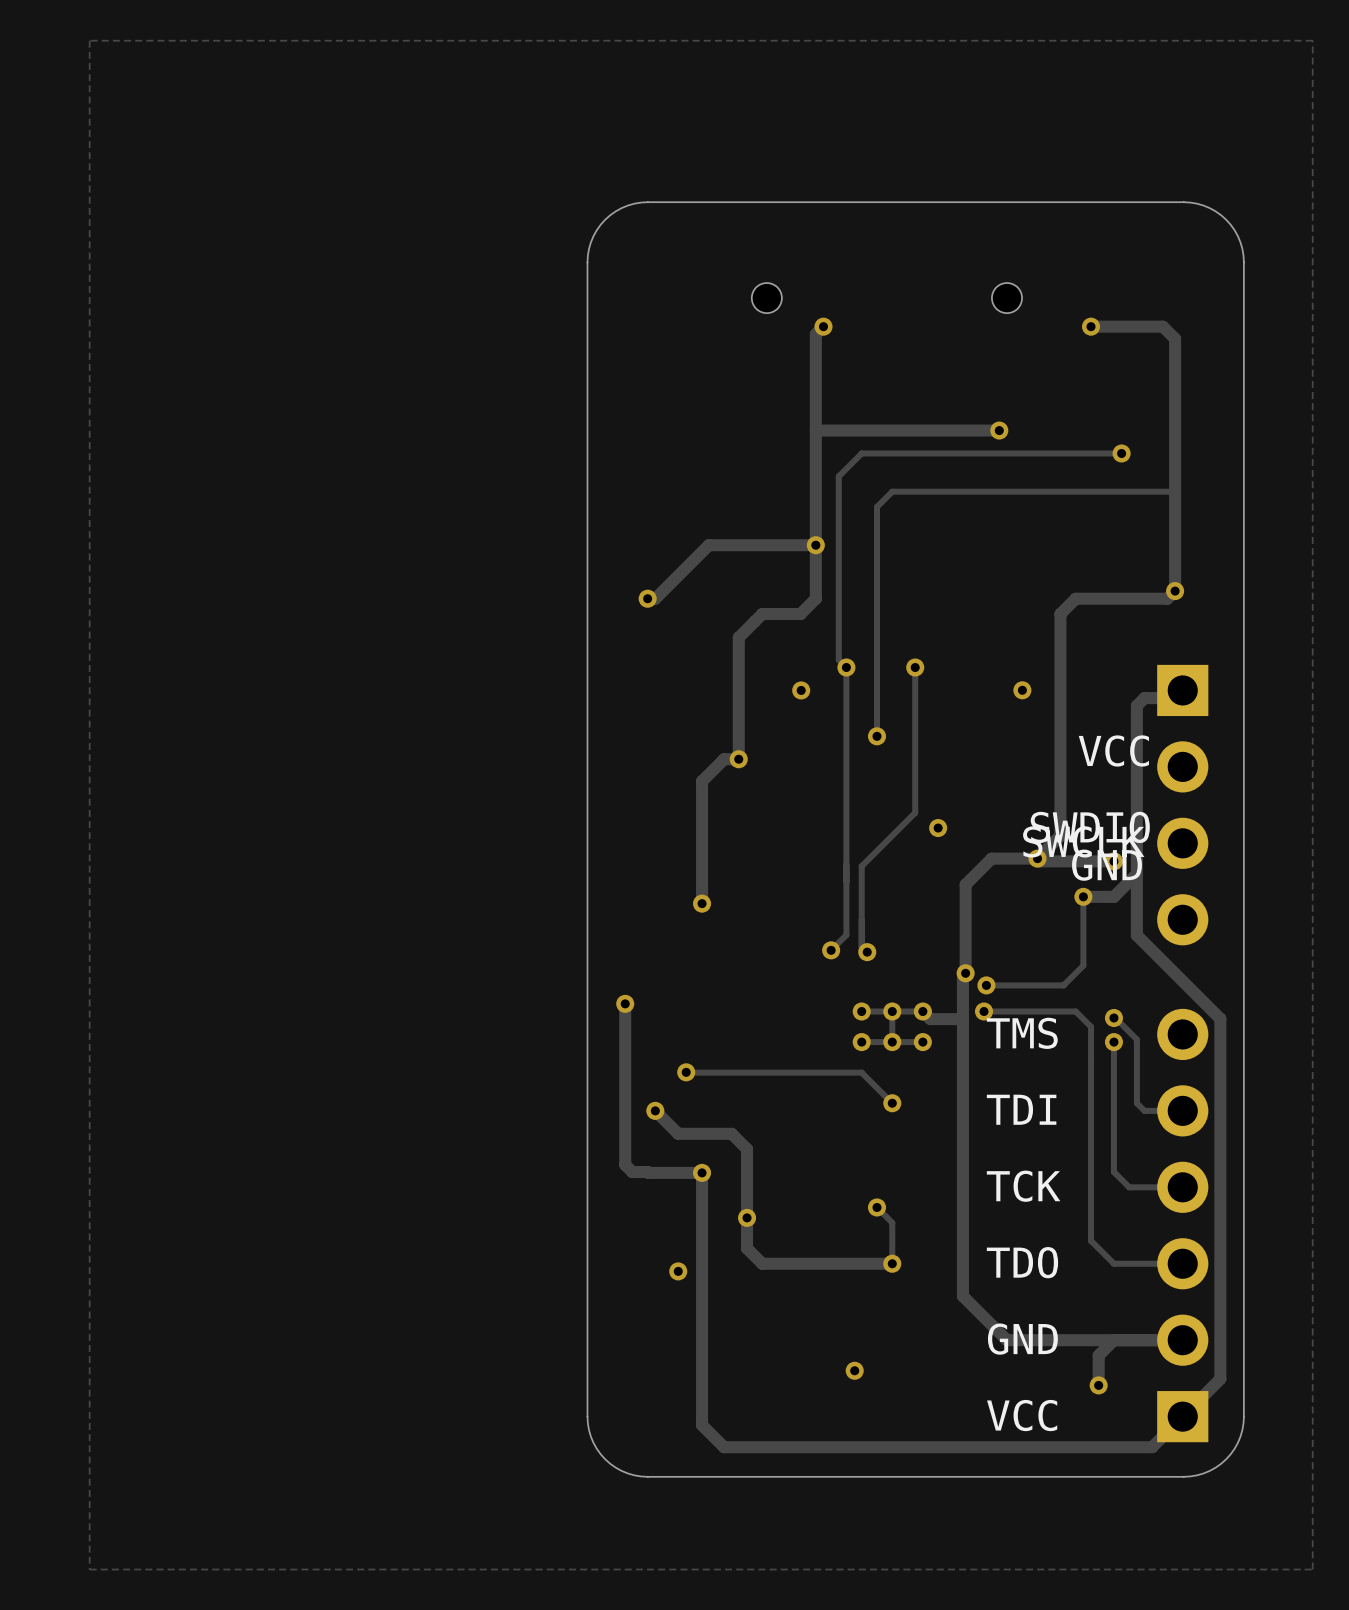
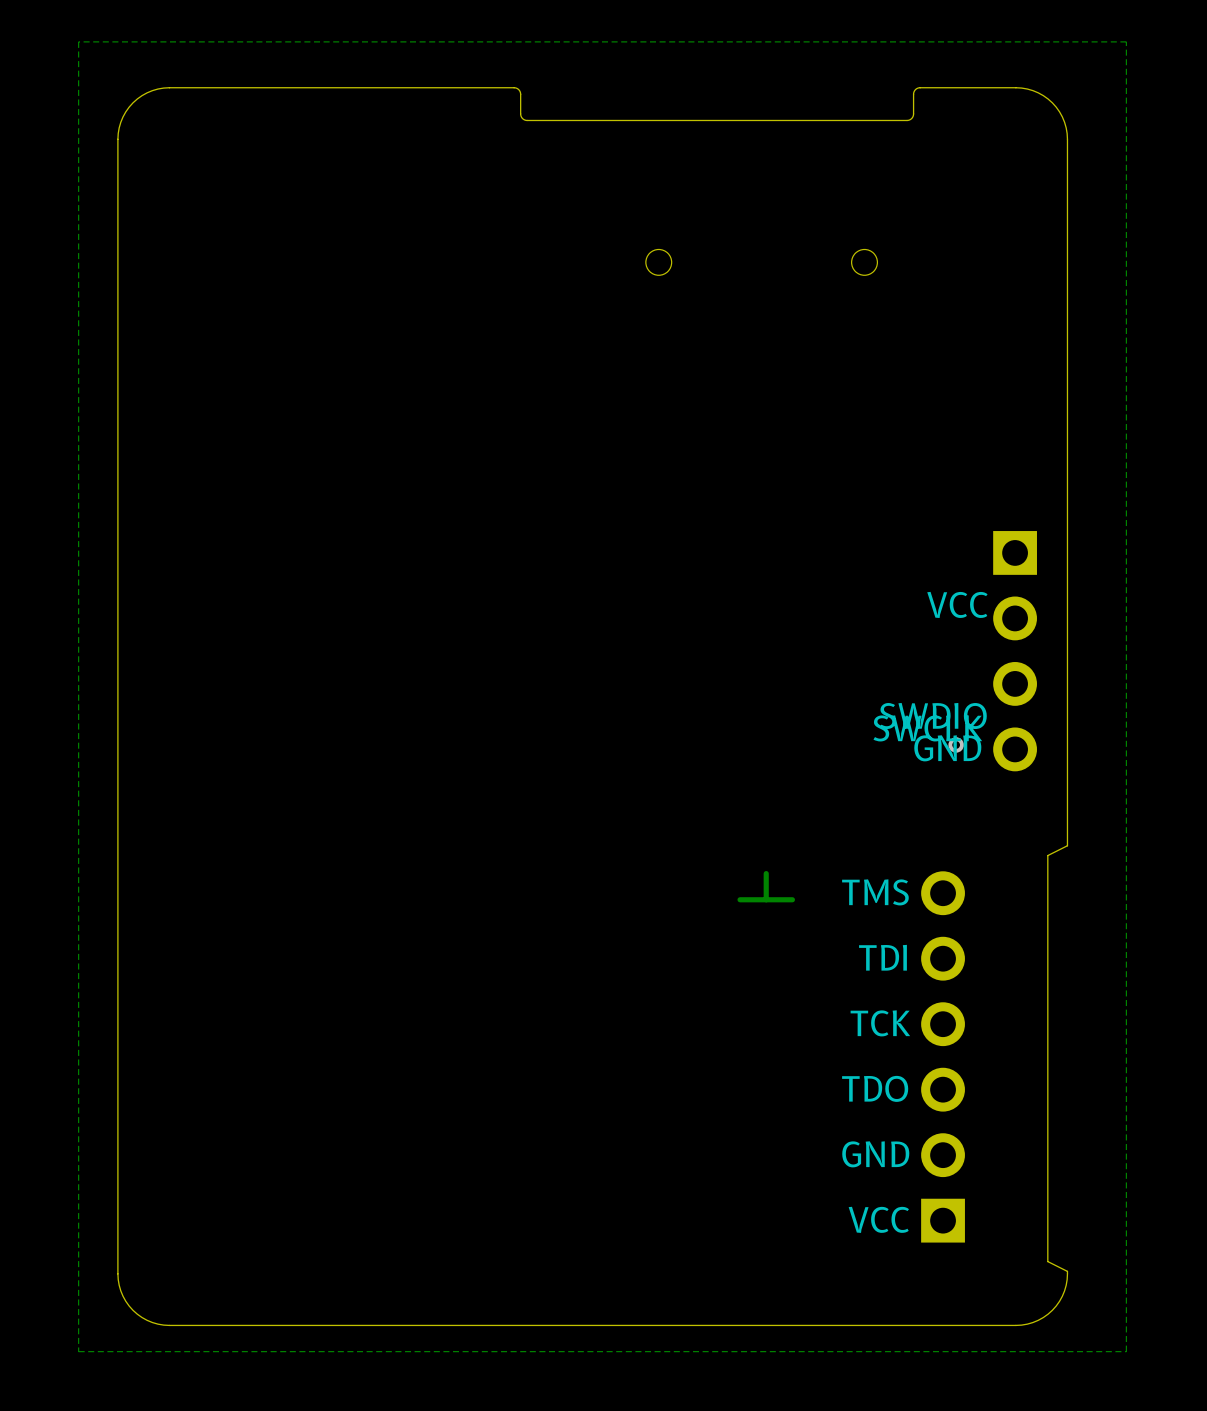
board edge: (1243, 262) (1240, 242) (1234, 230) (1226, 219) (1209, 208) (1197, 203) (1183, 202) (640, 202) (627, 205) (615, 211) (600, 224) (593, 236) (588, 248) (587, 262) (587, 1416) (590, 1436) (600, 1454) (610, 1463) (621, 1470) (634, 1475) (647, 1476) (1183, 1476) (1203, 1473) (1221, 1463) (1230, 1454) (1237, 1442) (1242, 1430) (1243, 1416) (1243, 979) -> (1067, 231) (1067, 139) (1064, 122) (1056, 107) (1048, 98) (1032, 90) (1021, 88) (918, 87) (913, 93) (913, 116) (907, 120) (526, 120) (520, 115) (520, 91) (514, 87) (169, 87) (147, 92) (129, 107) (120, 122) (117, 139) (117, 1273) (123, 1296) (129, 1306) (142, 1317) (152, 1322) (169, 1325) (1015, 1325) (1038, 1320) (1048, 1314) (1059, 1301) (1067, 1279) (1067, 1271) (1047, 1261) (1047, 855) (1067, 845)
track: (823, 326) (815, 334) (815, 598) (800, 614) (762, 614) (738, 637) (738, 759) (724, 759) (702, 781) (702, 903) -> none
via: (823, 326) -> none
track: (1091, 326) (1162, 326) (1175, 338) (1175, 591) (1167, 598) (1075, 598) (1060, 614) (1060, 835) (1037, 858) -> none
via: (1091, 326) -> none
track: (999, 430) (815, 430) -> none
via: (999, 430) -> none
track: (1121, 453) (861, 453) (838, 476) (838, 659) (846, 667) (846, 935) (831, 950) -> none
via: (1121, 453) -> none
track: (1175, 491) (892, 491) (876, 506) (876, 736) -> none
track: (815, 545) (708, 545) (655, 598) (647, 598) -> none
via: (815, 545) -> none
via: (1175, 591) -> none
via: (647, 598) -> none
via: (846, 667) -> none
track: (915, 667) (915, 812) (861, 866) (861, 950) -> none
via: (915, 667) -> none
via: (801, 690) -> none
via: (1022, 690) -> none
track: (1182, 690) (1175, 698) (1144, 698) (1136, 705) (1136, 935) (1220, 1018) (1220, 1379) (1152, 1447) (724, 1447) (702, 1425) (702, 1172) (632, 1172) (625, 1164) (625, 1003) -> none
via: (876, 736) -> none
text position: VCC (1113, 750) -> VCC (957, 604)
via: (738, 759) -> none
part position: (1182, 805) -> (1015, 651)
via: (938, 828) -> none
track: (1037, 858) (991, 858) (965, 884) (965, 973) (962, 975) (962, 1296) (1006, 1340) (1182, 1340) -> none
track: (1037, 858) (1040, 861) (1113, 861) -> none
via: (1037, 858) -> none
track: (1136, 873) (1113, 896) (1083, 896) (1083, 965) (1063, 985) (986, 985) -> none
via: (1083, 896) -> none
via: (702, 903) -> none
via: (831, 950) -> none
via: (867, 952) -> none
via: (965, 973) -> none
via: (986, 985) -> none
via: (625, 1003) -> none
track: (861, 1011) (922, 1011) (930, 1019) (962, 1019) -> none
via: (861, 1011) -> none
via: (892, 1011) -> none
via: (922, 1011) -> none
track: (984, 1011) (1075, 1011) (1091, 1026) (1091, 1240) (1113, 1263) (1182, 1263) -> none
via: (984, 1011) -> none
track: (1113, 1018) (1136, 1039) (1136, 1103) (1144, 1110) (1182, 1110) -> none
via: (1113, 1018) -> none
via: (861, 1042) -> none
via: (892, 1042) -> none
via: (922, 1042) -> none
track: (1113, 1042) (1113, 1172) (1129, 1187) (1182, 1187) -> none
via: (1113, 1042) -> none
track: (686, 1072) (861, 1072) (892, 1103) -> none
via: (686, 1072) -> none
via: (892, 1103) -> none
track: (655, 1110) (678, 1133) (731, 1133) (747, 1149) (747, 1248) (762, 1263) (892, 1263) (892, 1222) (876, 1207) -> none
via: (655, 1110) -> none
via: (702, 1172) -> none
via: (876, 1207) -> none
via: (747, 1217) -> none
part position: (1182, 1225) -> (943, 1056)
via: (892, 1263) -> none
via: (678, 1271) -> none
track: (1113, 1340) (1098, 1355) (1098, 1385) -> none
via: (854, 1370) -> none
via: (1098, 1385) -> none

